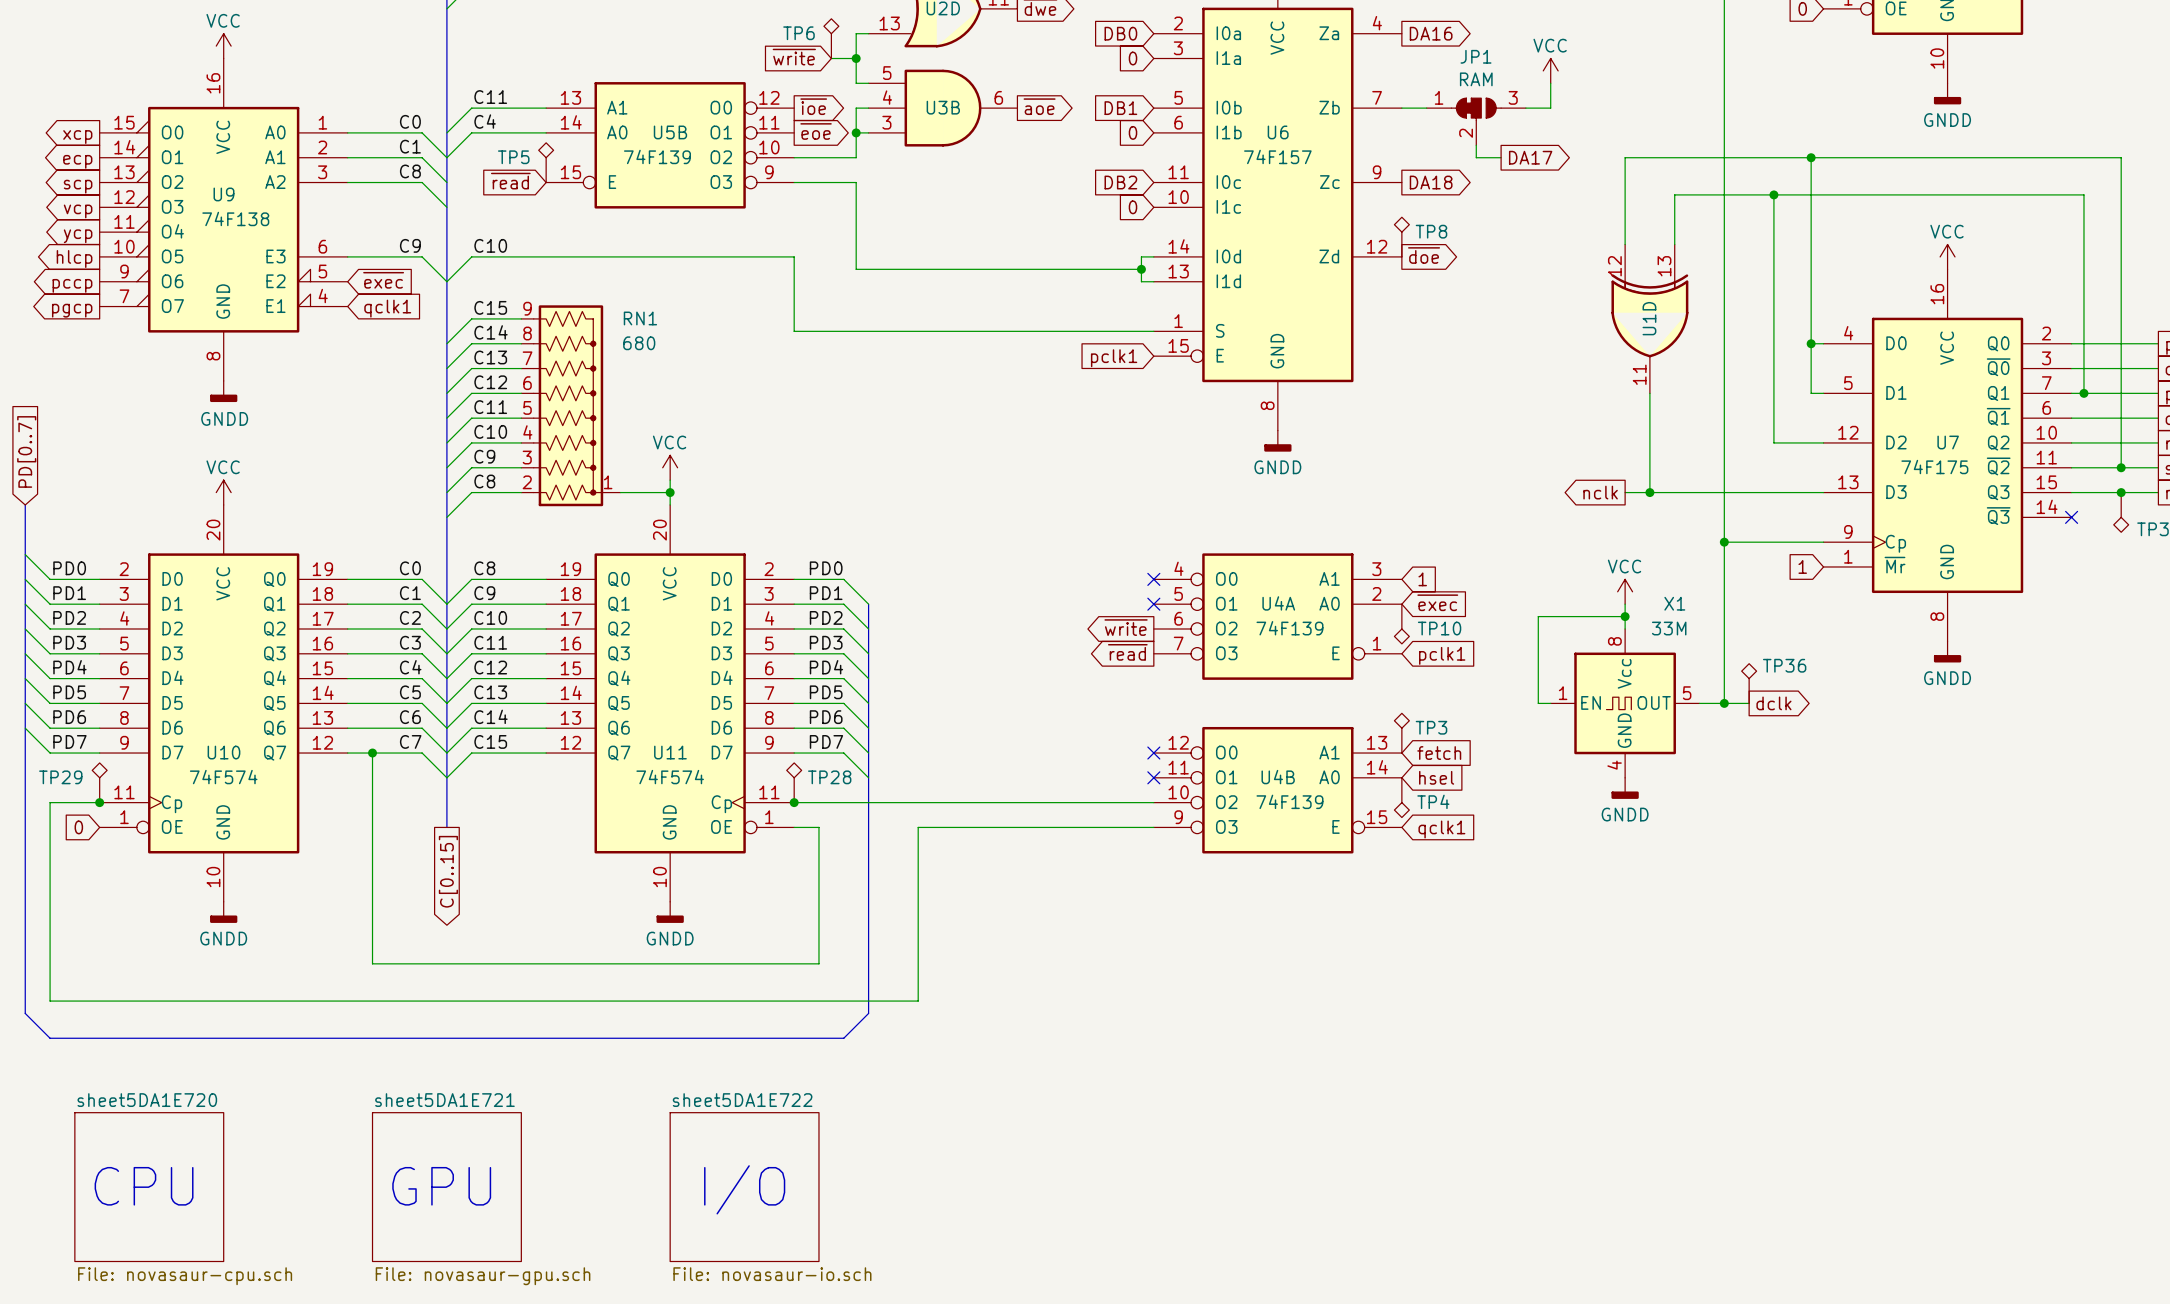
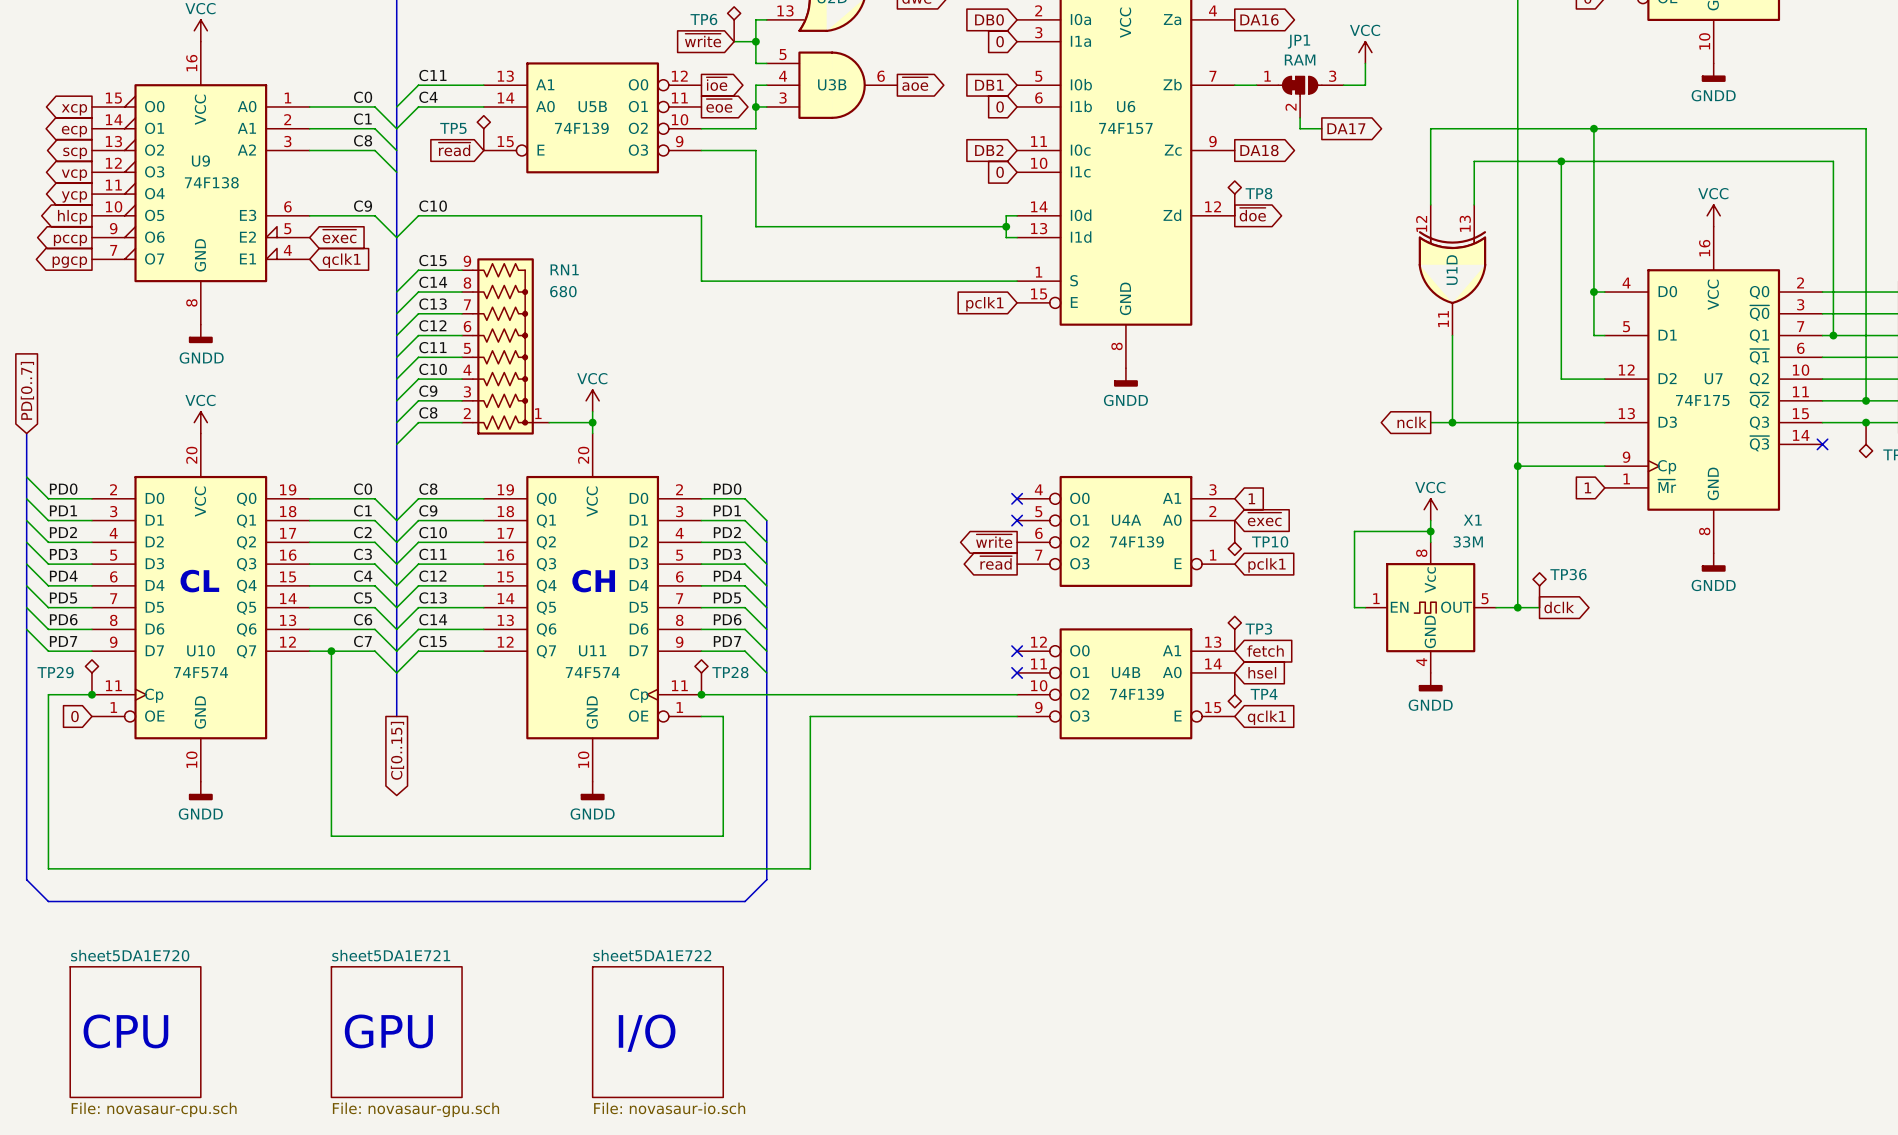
text: none -> CL (199, 581)
text: none -> CH (593, 581)

